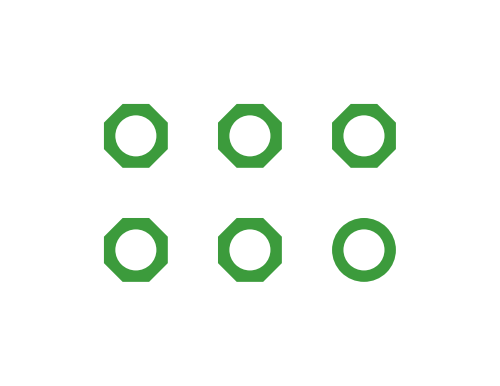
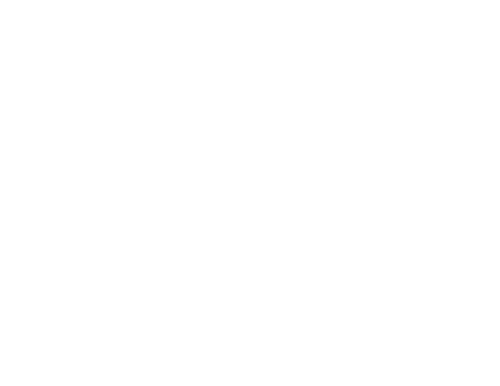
part: (249, 192) -> none

